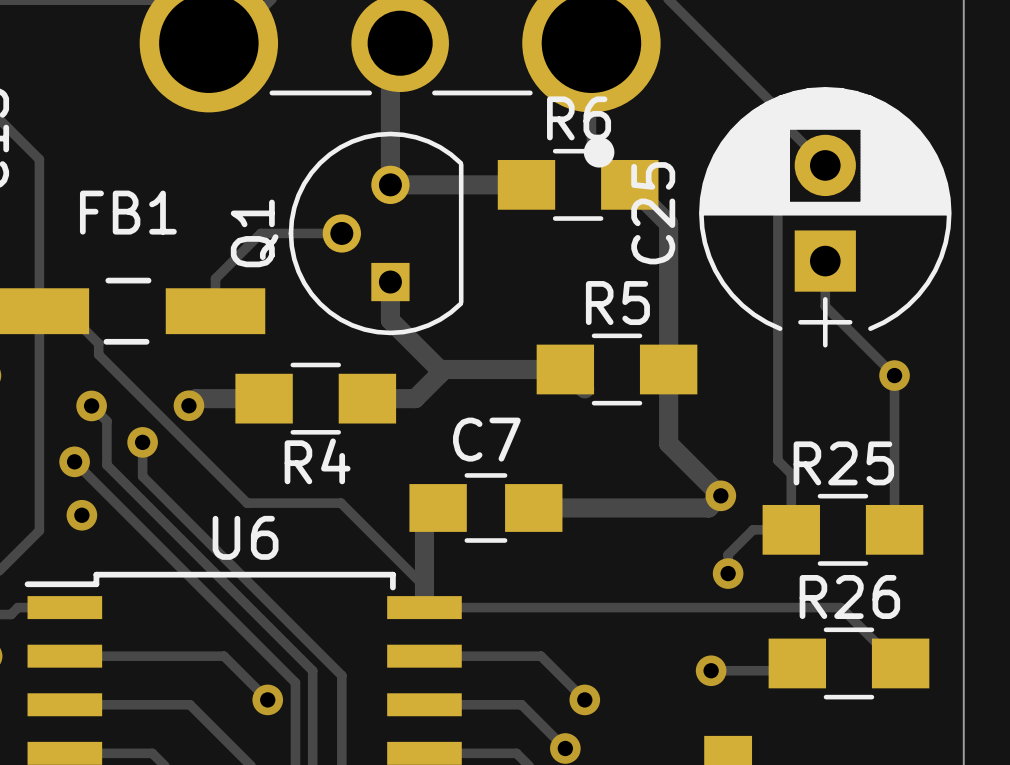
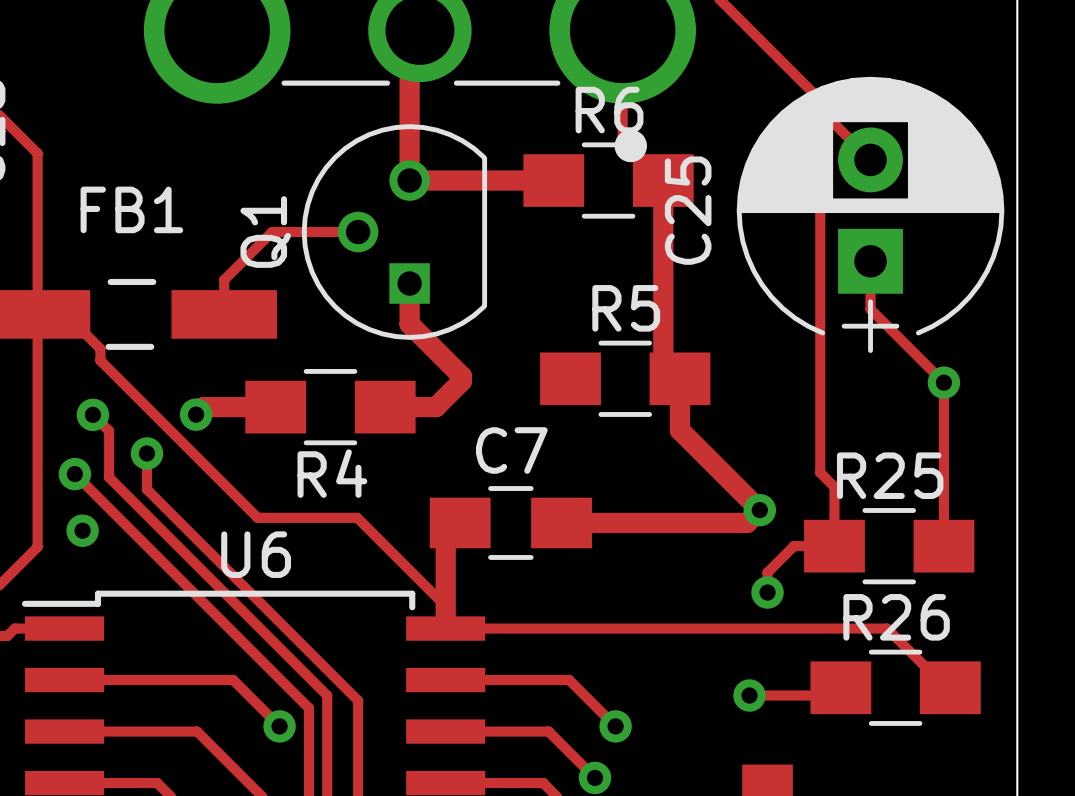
track: (629, 184) (668, 223) (668, 443) -> (663, 180) (663, 362) (679, 378) (679, 430) (704, 454)
track: (439, 369) (565, 369) (584, 388) -> none
R5 position: (617, 369) -> (625, 378)

